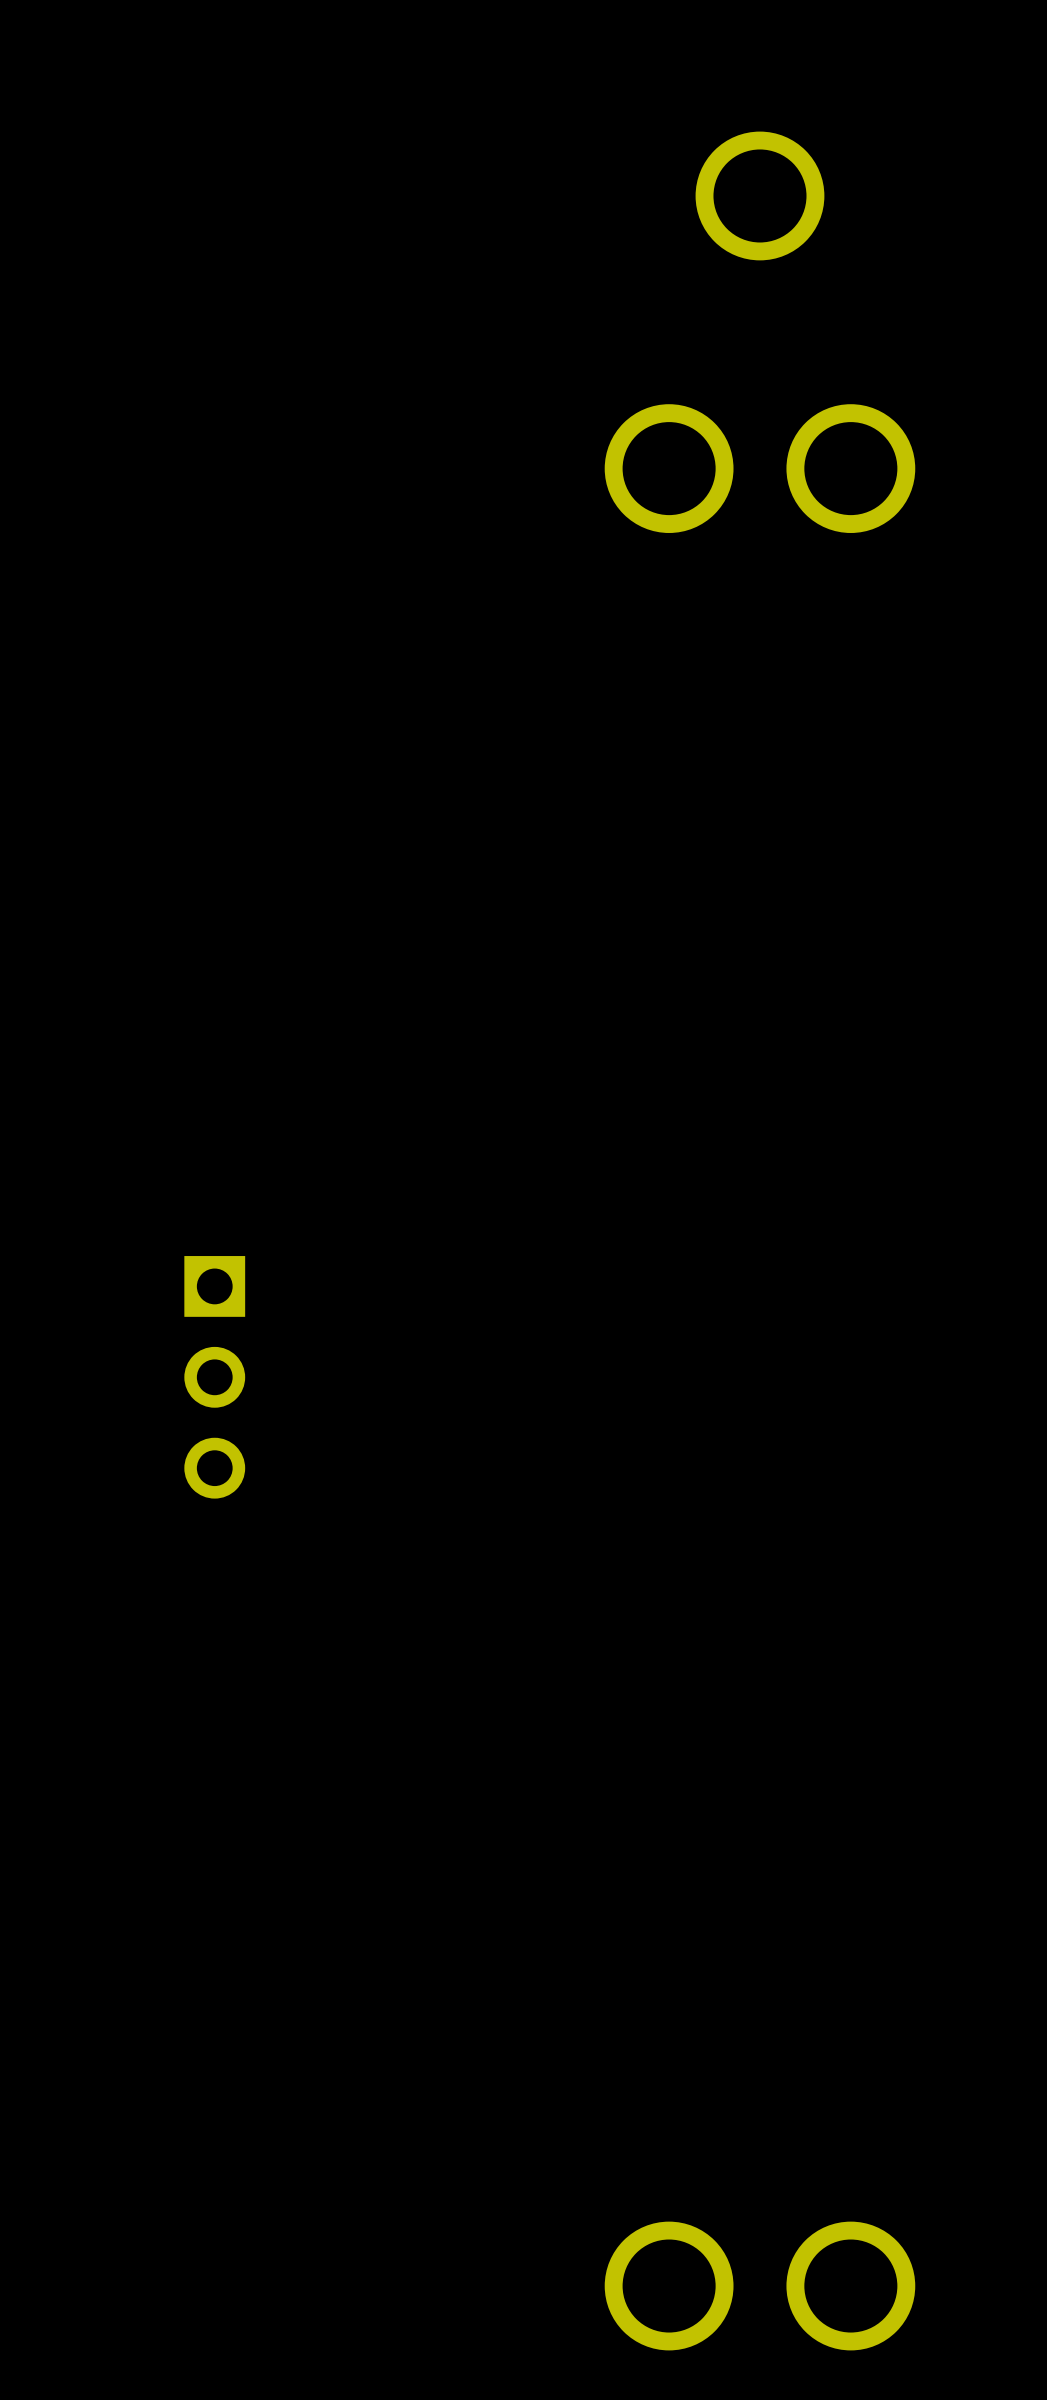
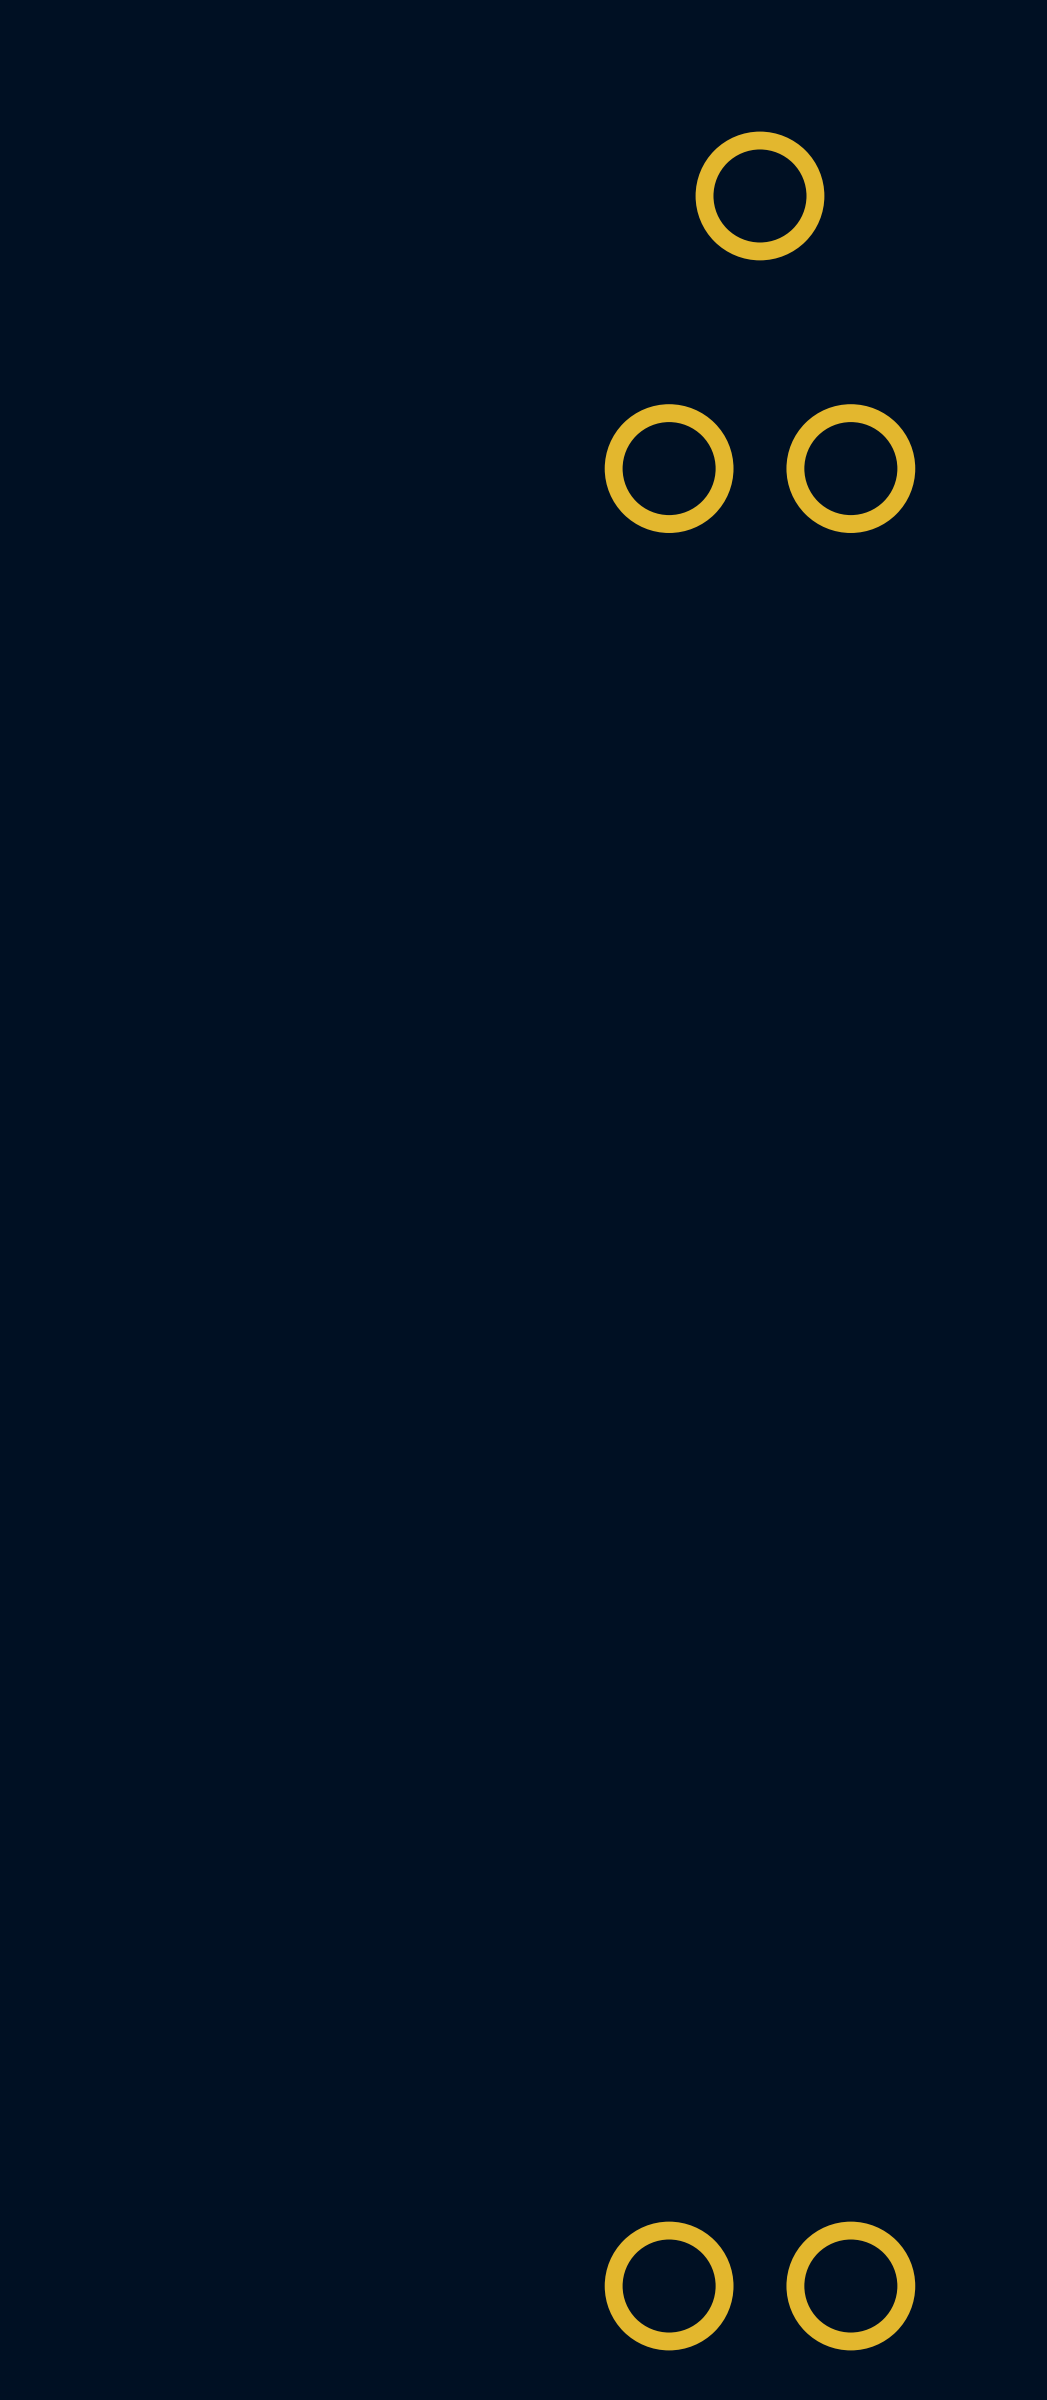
part: (214, 1377) -> none

